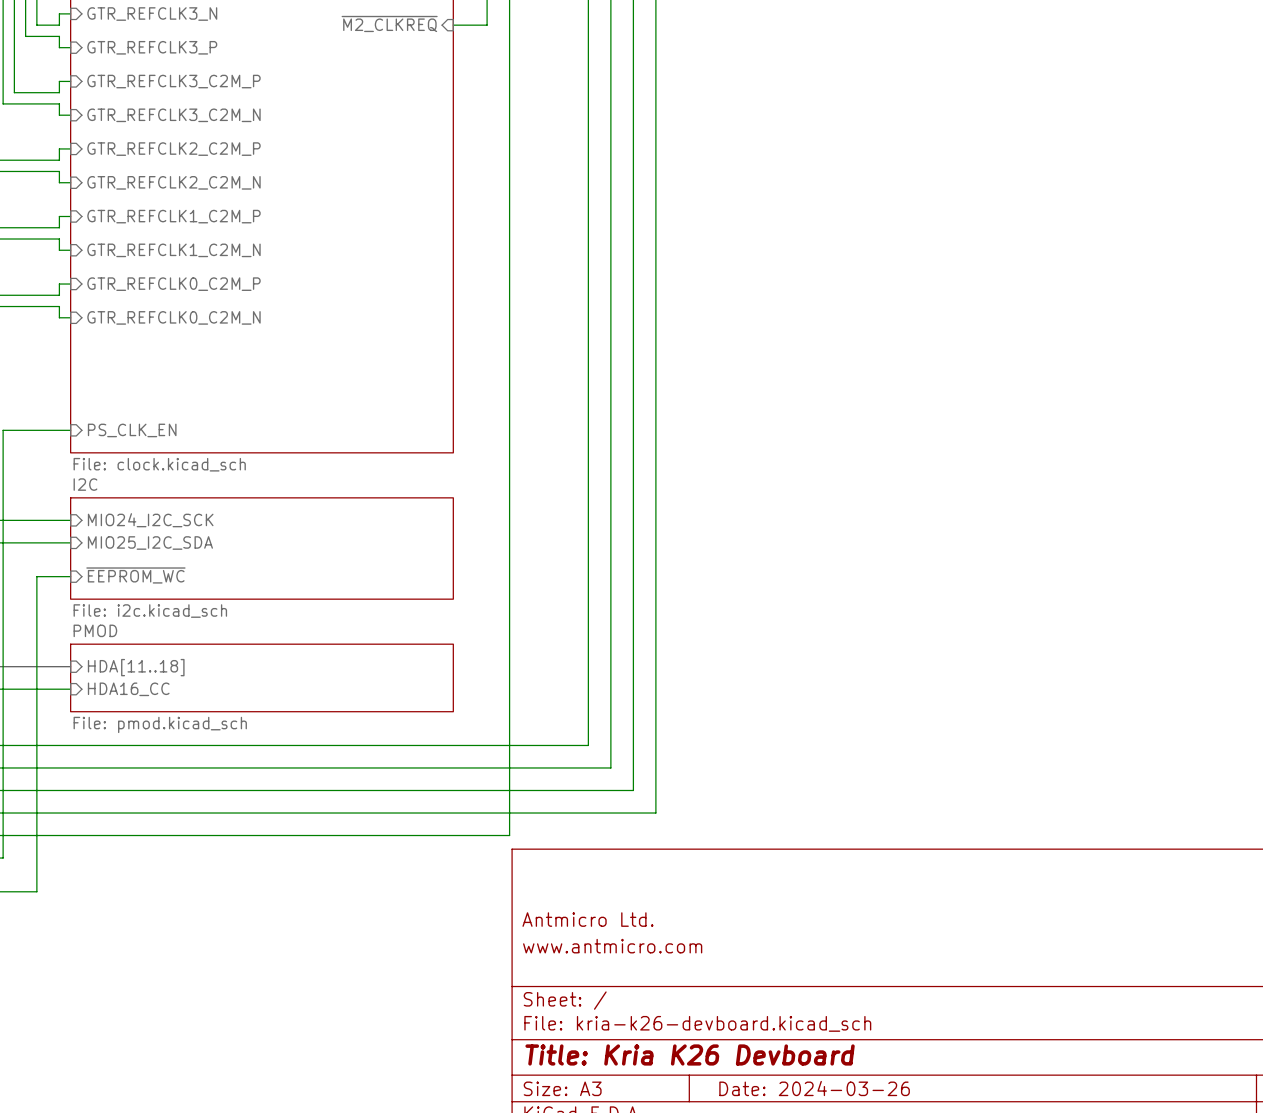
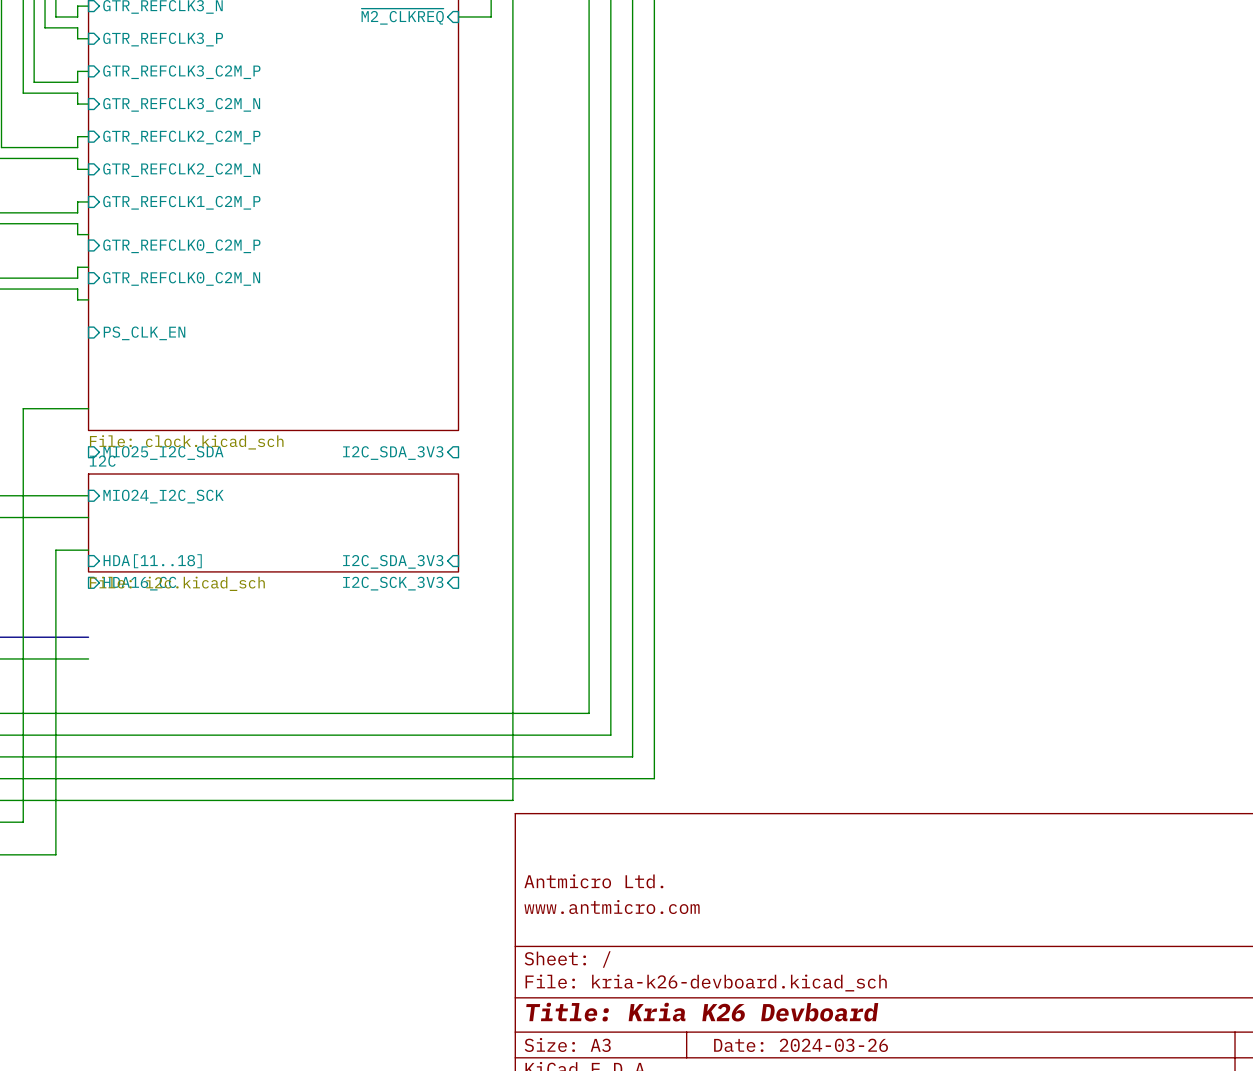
sheet pin: GTR_REFCLK1_C2M_N (173, 250) -> none
sheet pin position: GTR_REFCLK0_C2M_P (173, 284) -> GTR_REFCLK0_C2M_P (181, 246)
sheet pin position: GTR_REFCLK0_C2M_N (173, 317) -> GTR_REFCLK0_C2M_N (181, 278)
sheet pin position: PS_CLK_EN (132, 430) -> PS_CLK_EN (144, 333)
sheet pin: none -> I2C_SDA_3V3 (393, 453)
sheet pin position: MIO25_I2C_SDA (150, 543) -> MIO25_I2C_SDA (163, 453)
sheet pin: ~{EEPROM_WC} (135, 575) -> none
sheet pin: none -> I2C_SDA_3V3 (393, 561)
sheet pin: none -> I2C_SCK_3V3 (393, 583)
sheet pin position: HDA[11..18] (136, 667) -> HDA[11..18] (152, 561)
sheet PMOD: File: pmod.kicad_sch (261, 677) -> none
sheet pin position: HDA16_CC (128, 689) -> HDA16_CC (139, 583)

